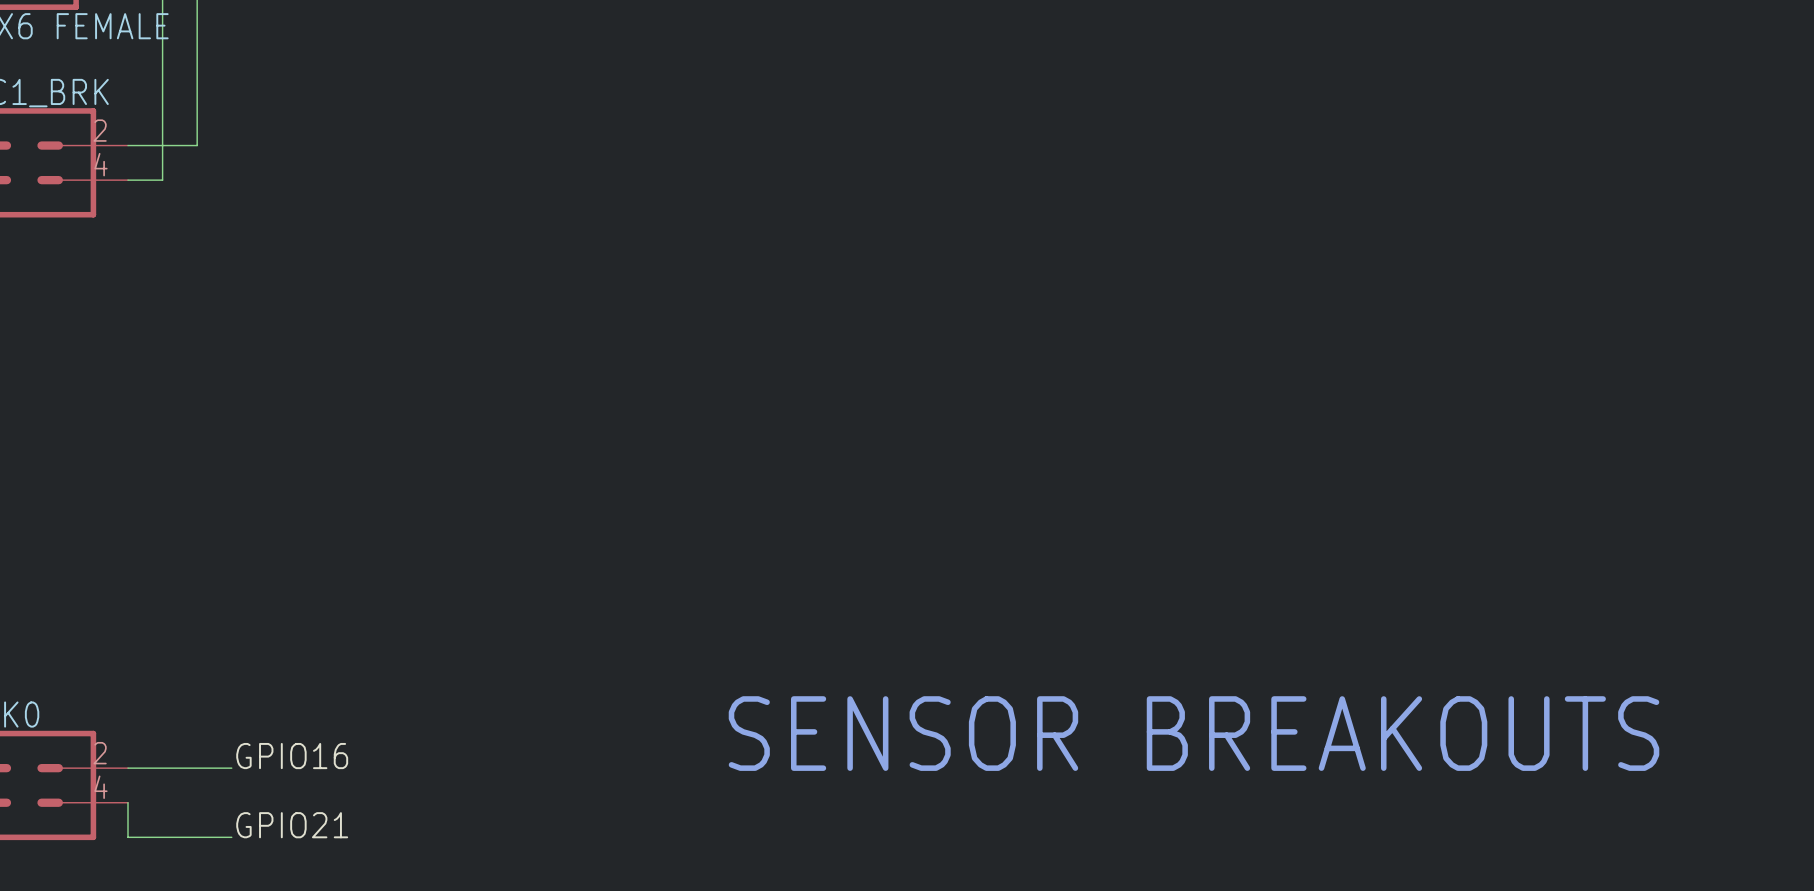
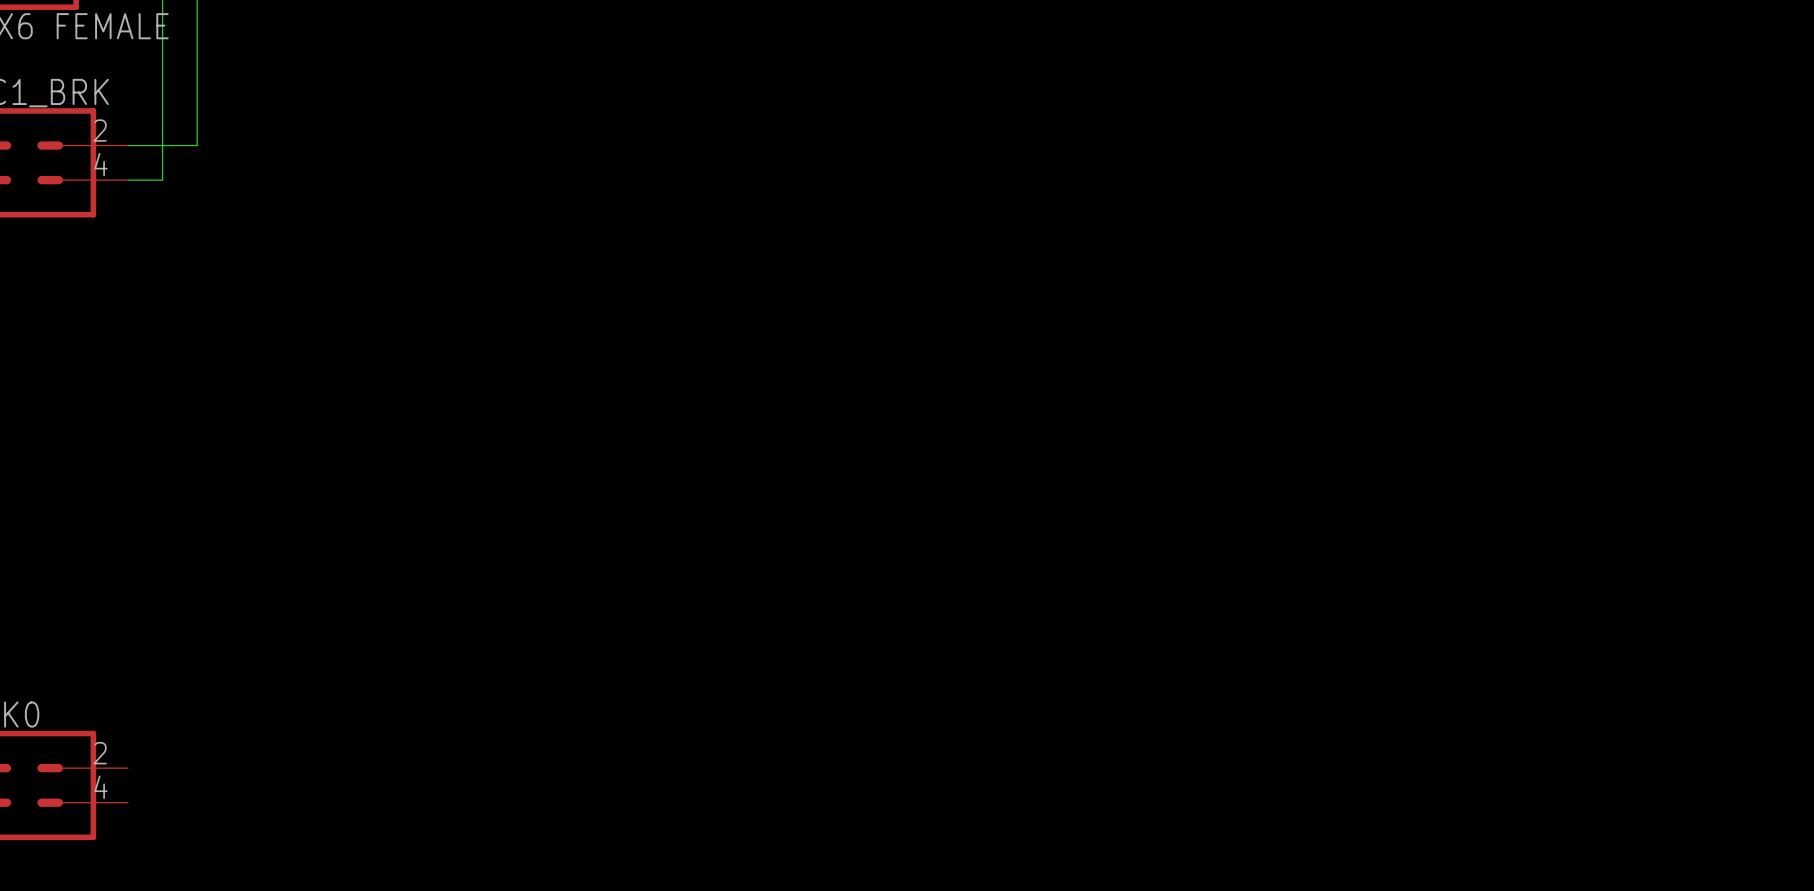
text: SENSOR BREAKOUTS (1194, 733) -> none
label: GPIO16 (292, 756) -> none
wire: (128, 768) (231, 768) -> none
wire: (128, 802) (128, 837) (231, 837) -> none
label: GPIO21 (292, 825) -> none

